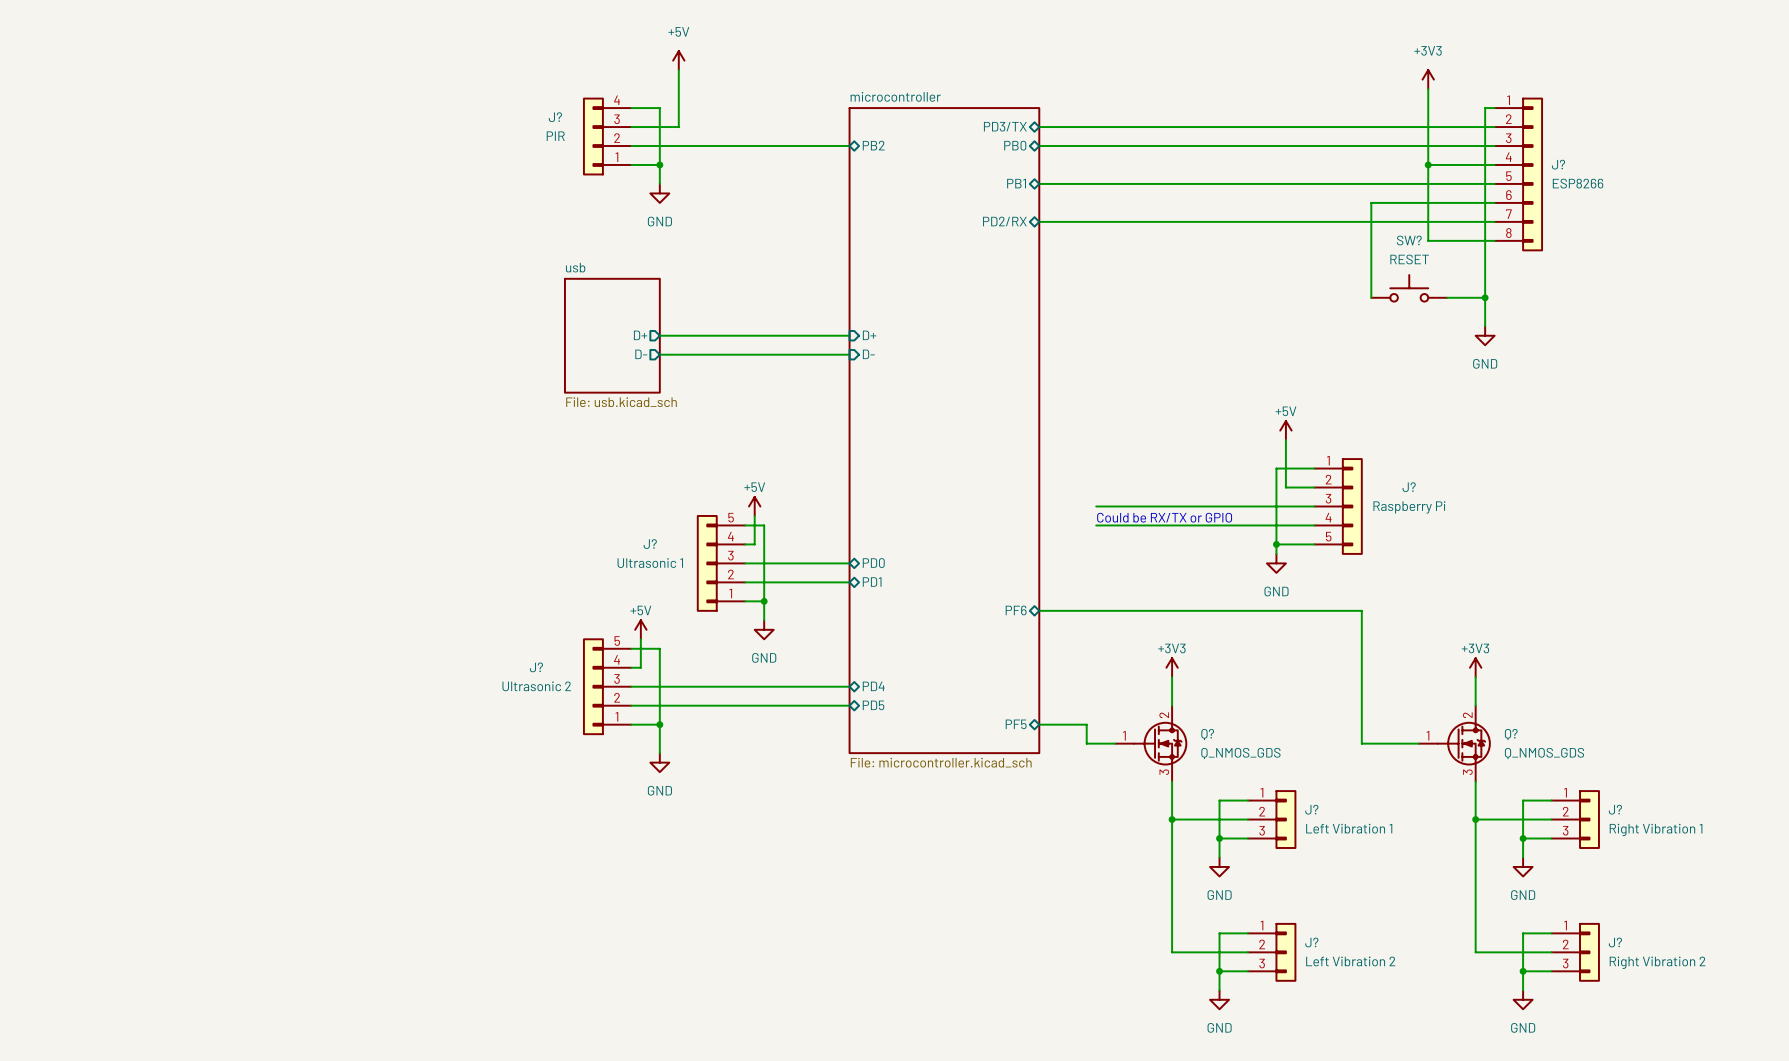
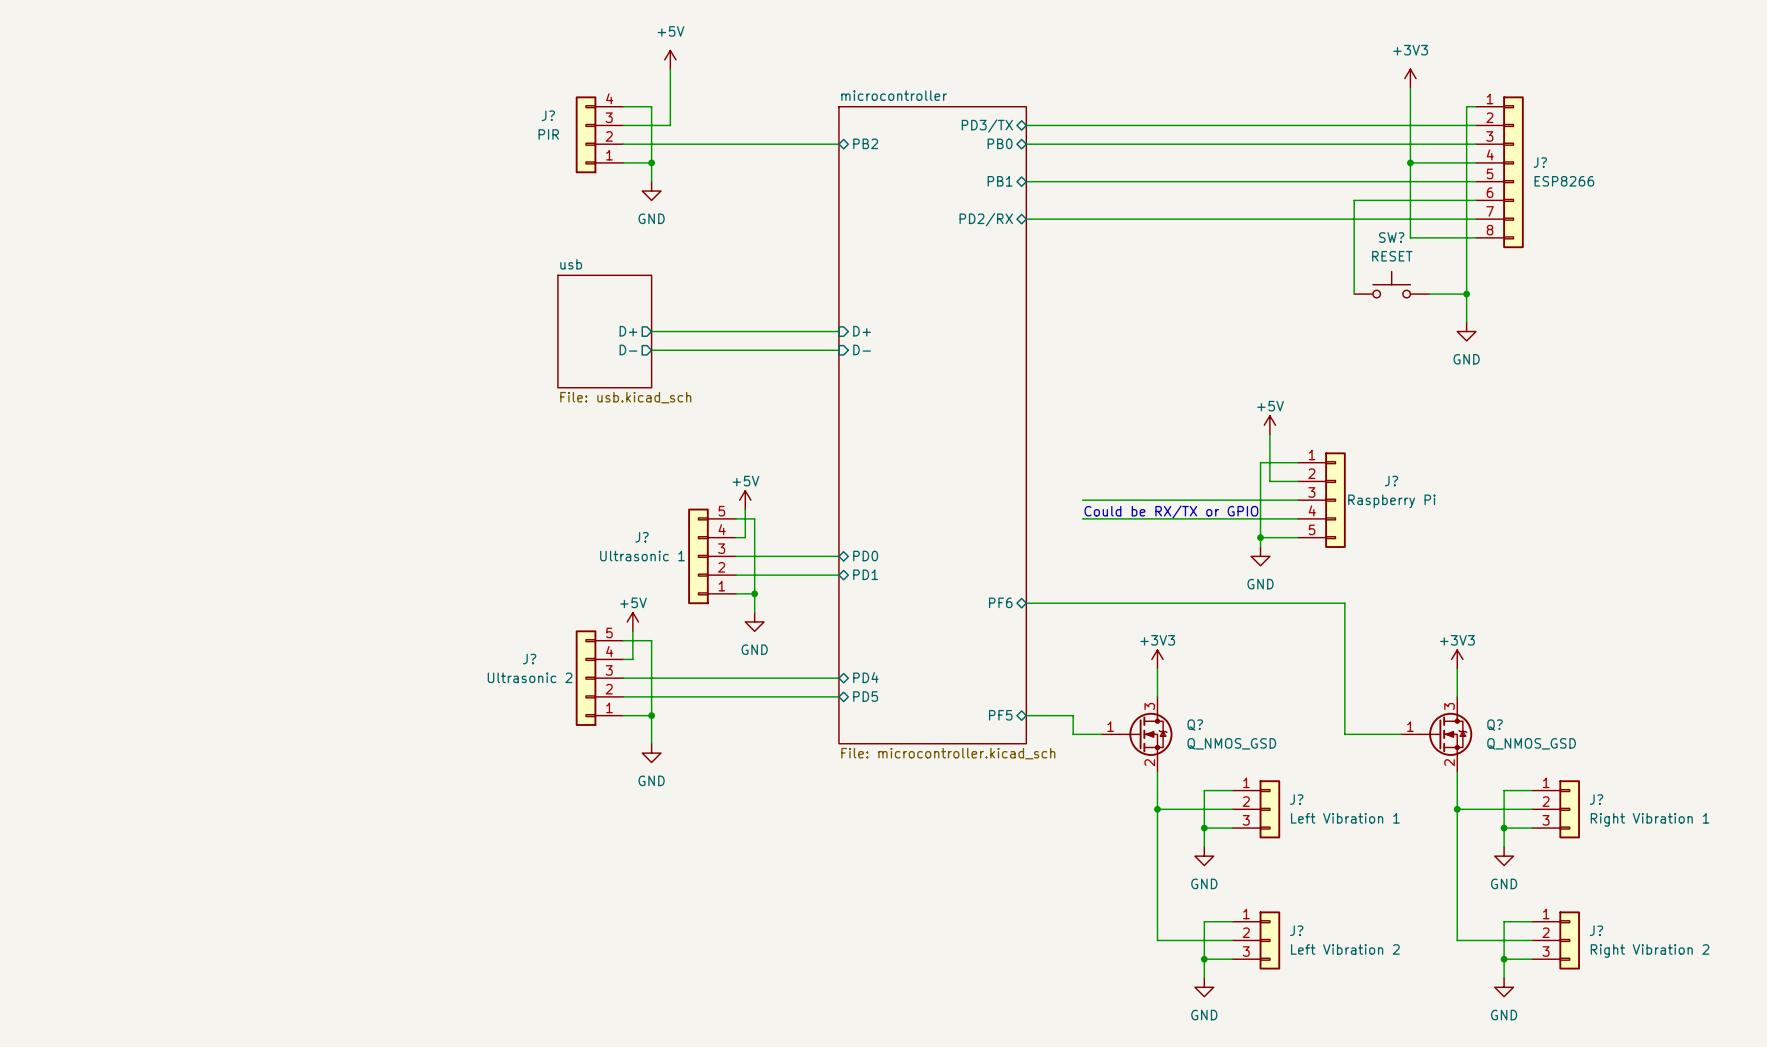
Q? pin number: 2 (1164, 715) -> 3 (1149, 706)
Q? pin number: 2 (1467, 715) -> 3 (1449, 706)
Q? value: Q_NMOS_GDS (1240, 753) -> Q_NMOS_GSD (1231, 743)
Q? value: Q_NMOS_GDS (1544, 753) -> Q_NMOS_GSD (1531, 743)
Q? pin number: 3 (1164, 772) -> 2 (1149, 762)
Q? pin number: 3 (1467, 772) -> 2 (1449, 762)

